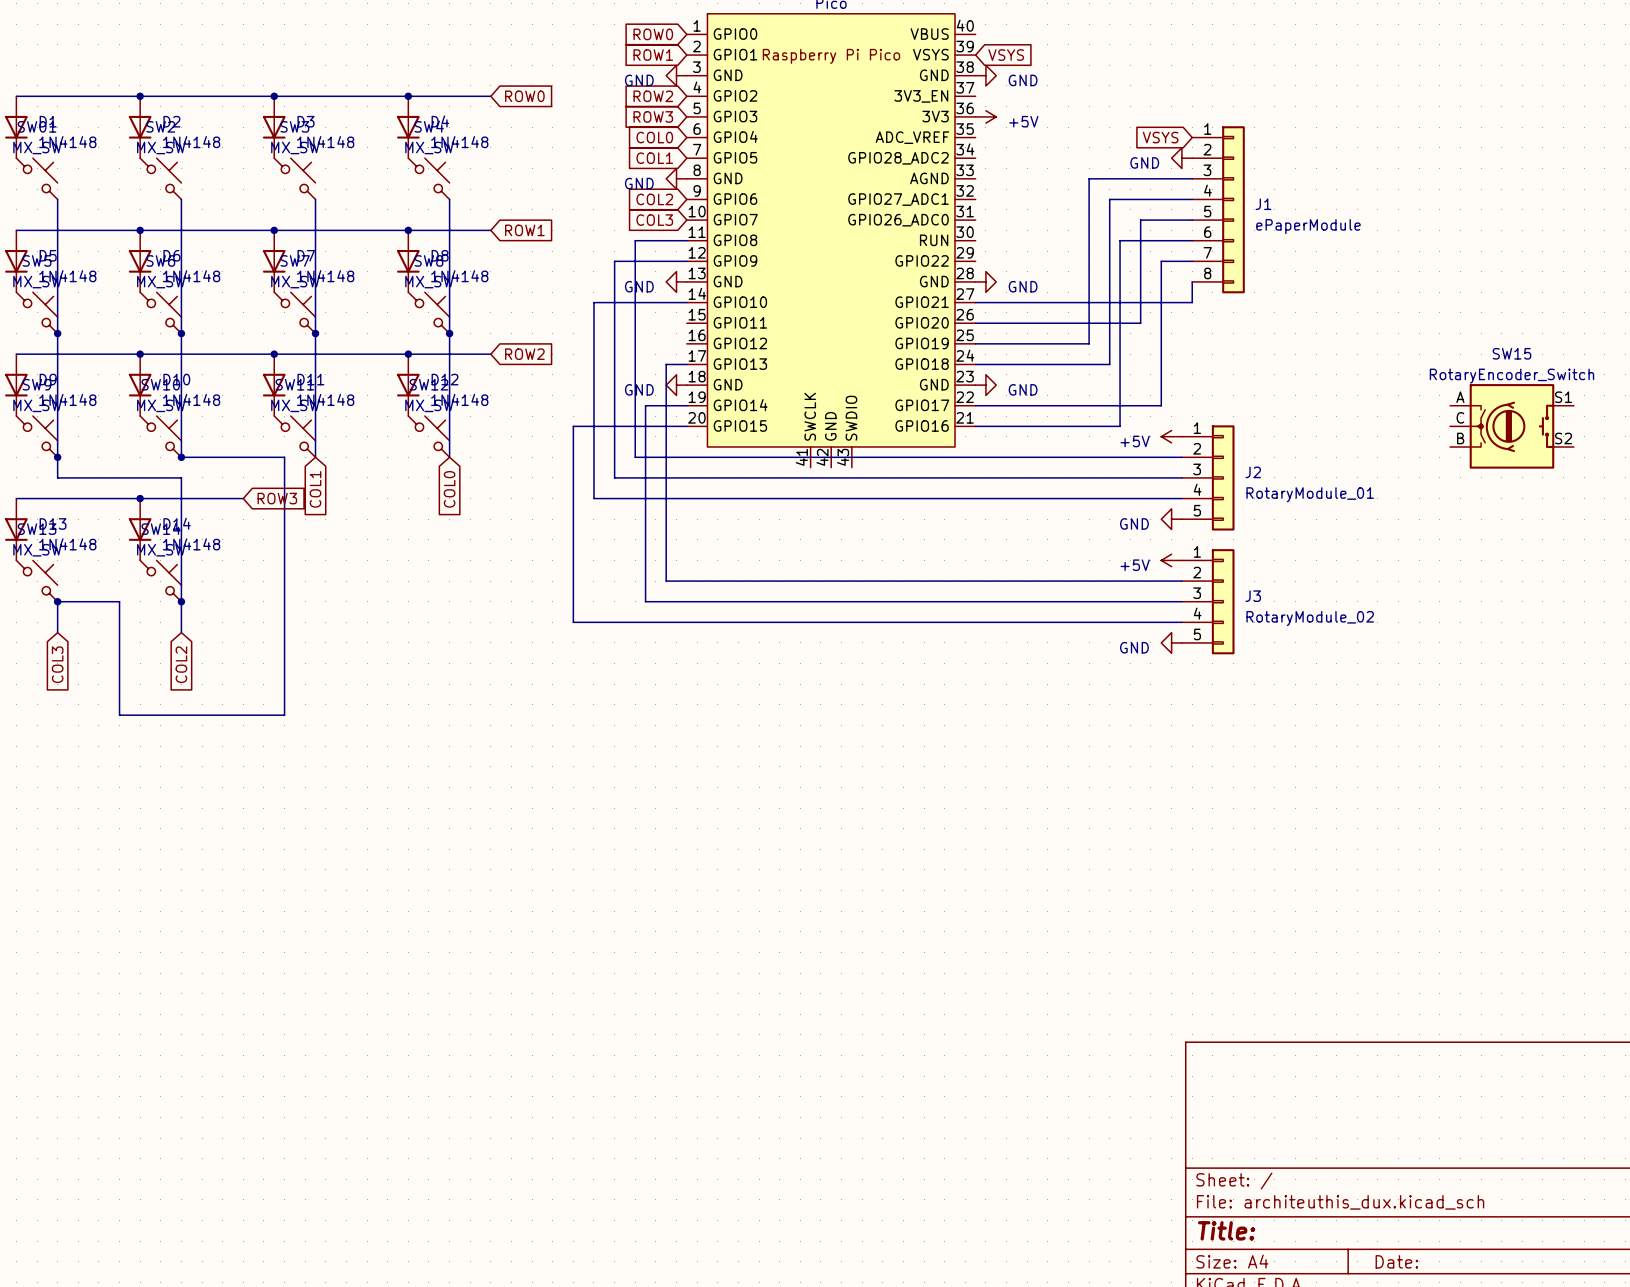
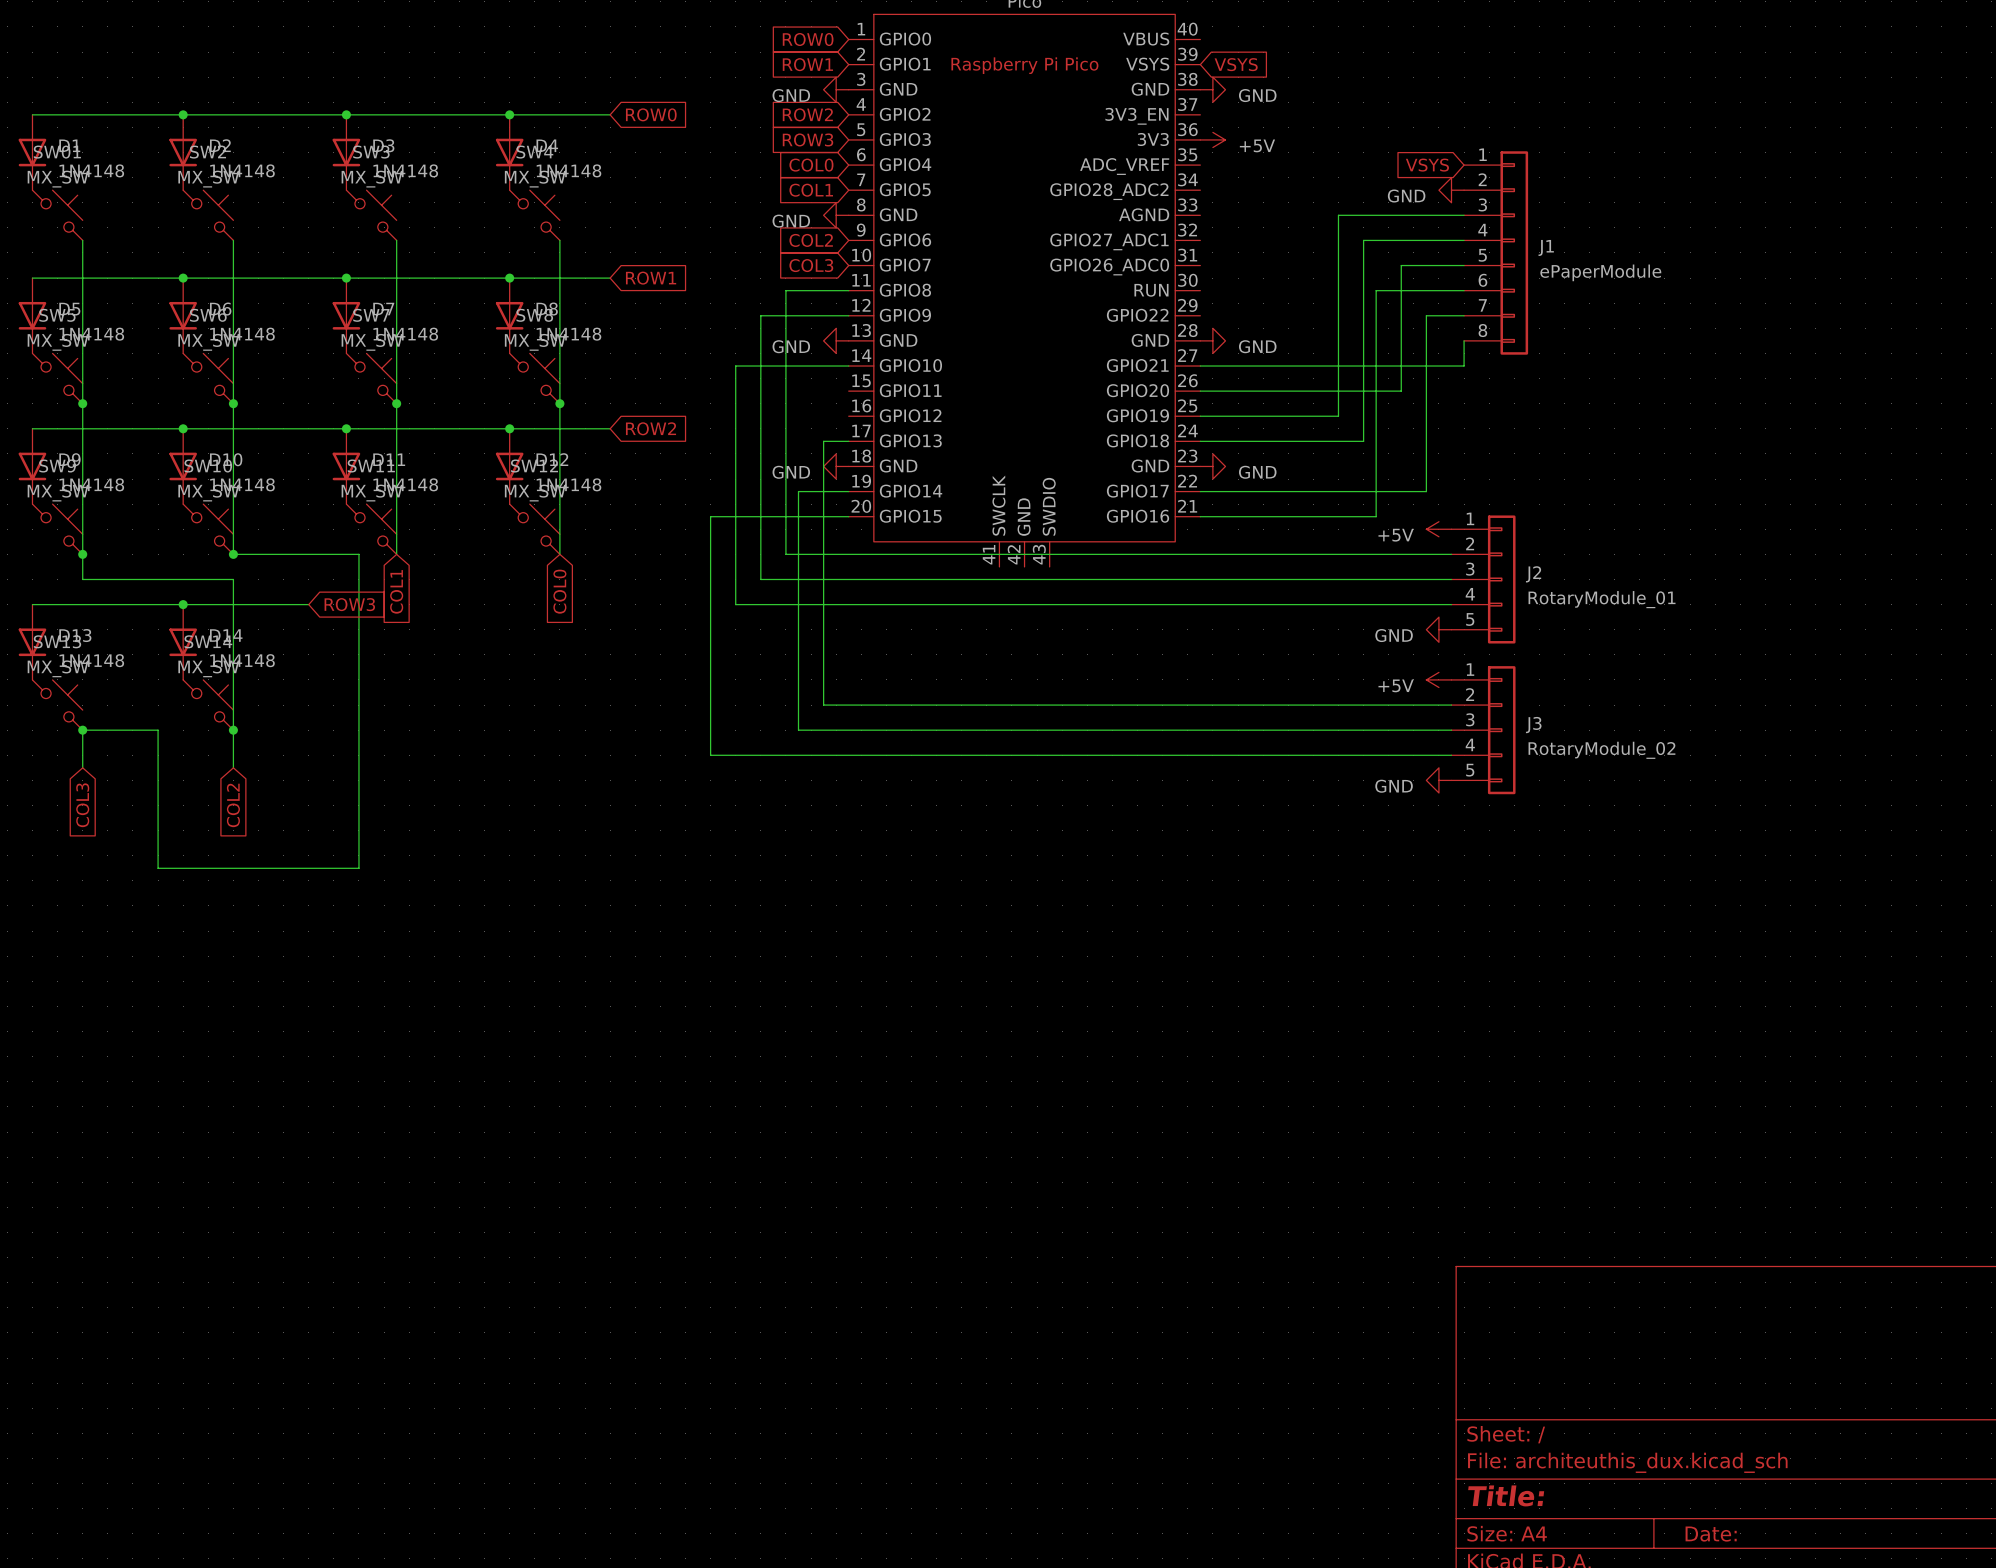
SW15: RotaryEncoder_Switch (1511, 426) -> none

